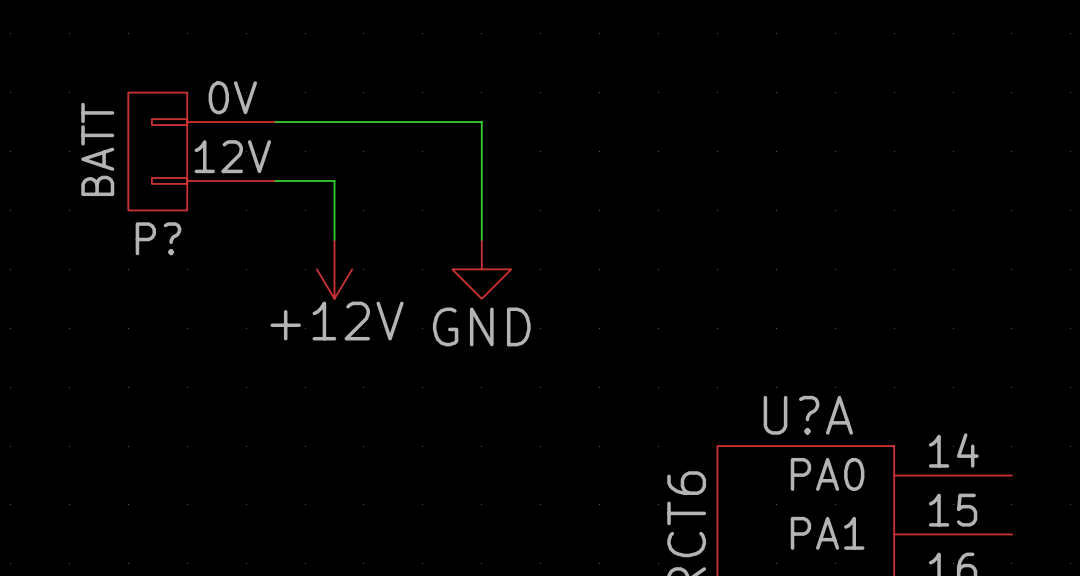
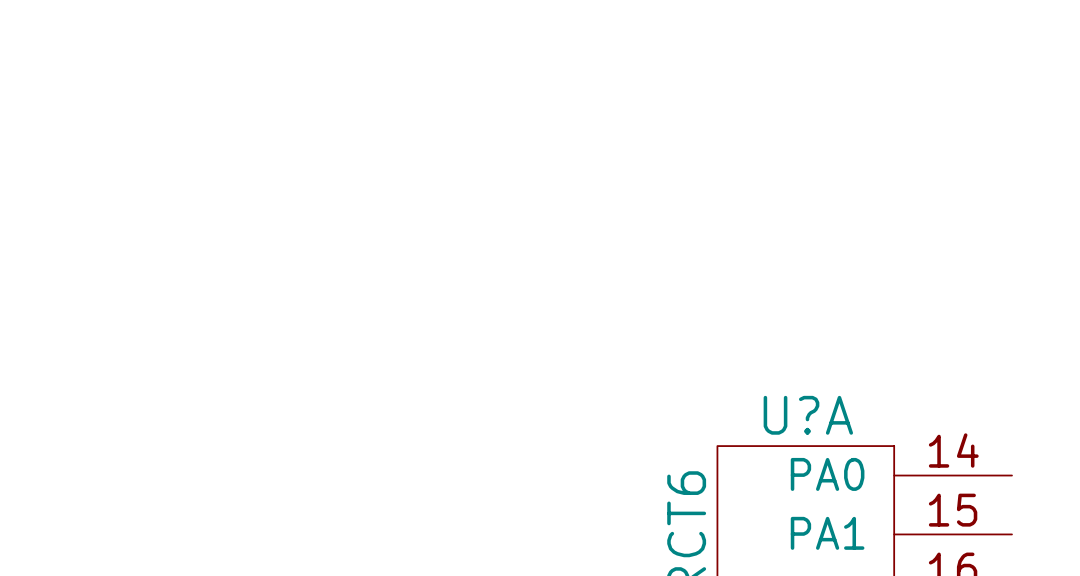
wire: (275, 122) (481, 122) (481, 239) -> none
P?: BATT (201, 151) -> none
wire: (275, 180) (334, 180) (334, 239) -> none
power symbol: +12V (334, 269) -> none
power symbol: GND (481, 269) -> none

